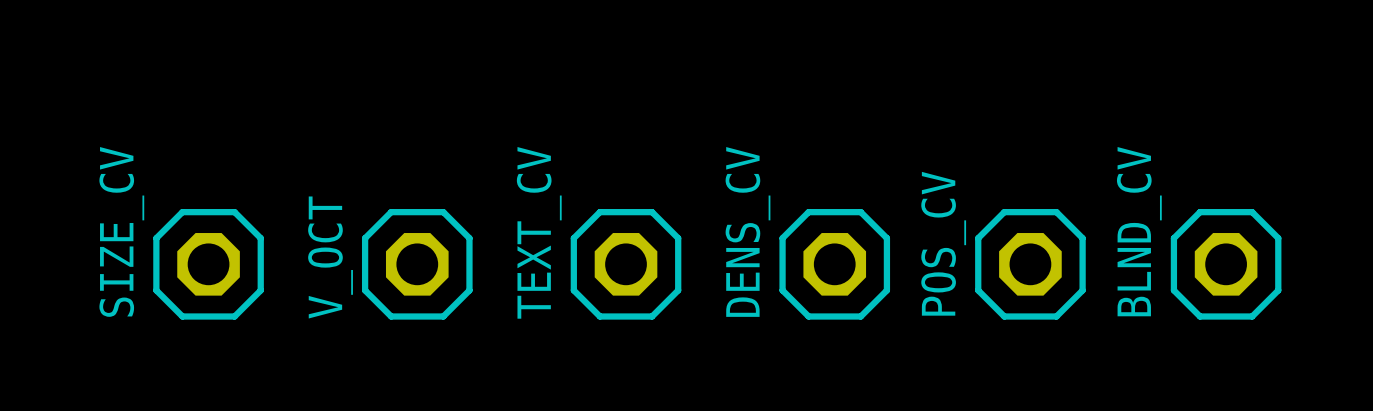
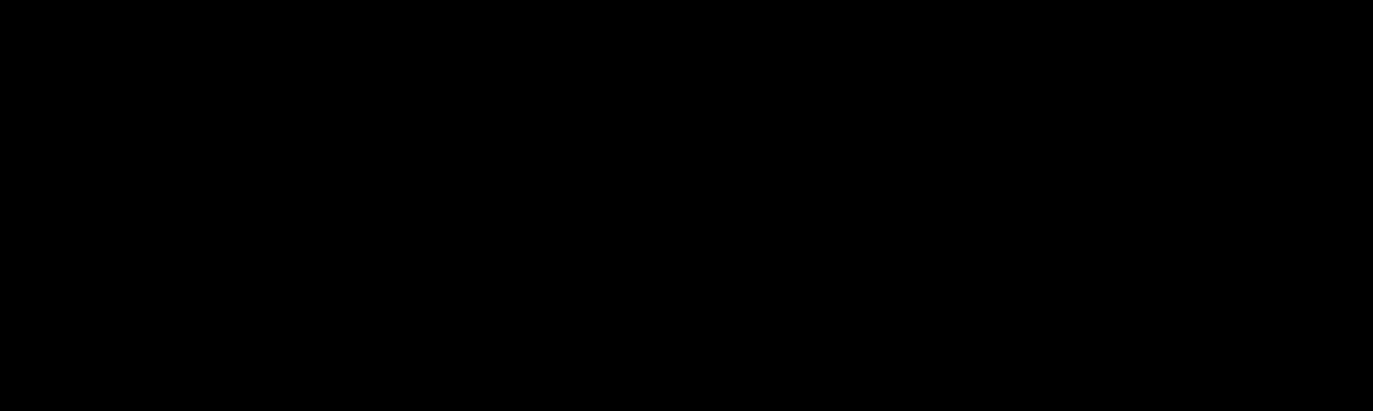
SIZE_CV: (208, 264) -> none
V_OCT: (417, 264) -> none
TEXT_CV: (626, 264) -> none
DENS_CV: (834, 264) -> none
POS_CV: (1030, 264) -> none
BLND_CV: (1226, 264) -> none

